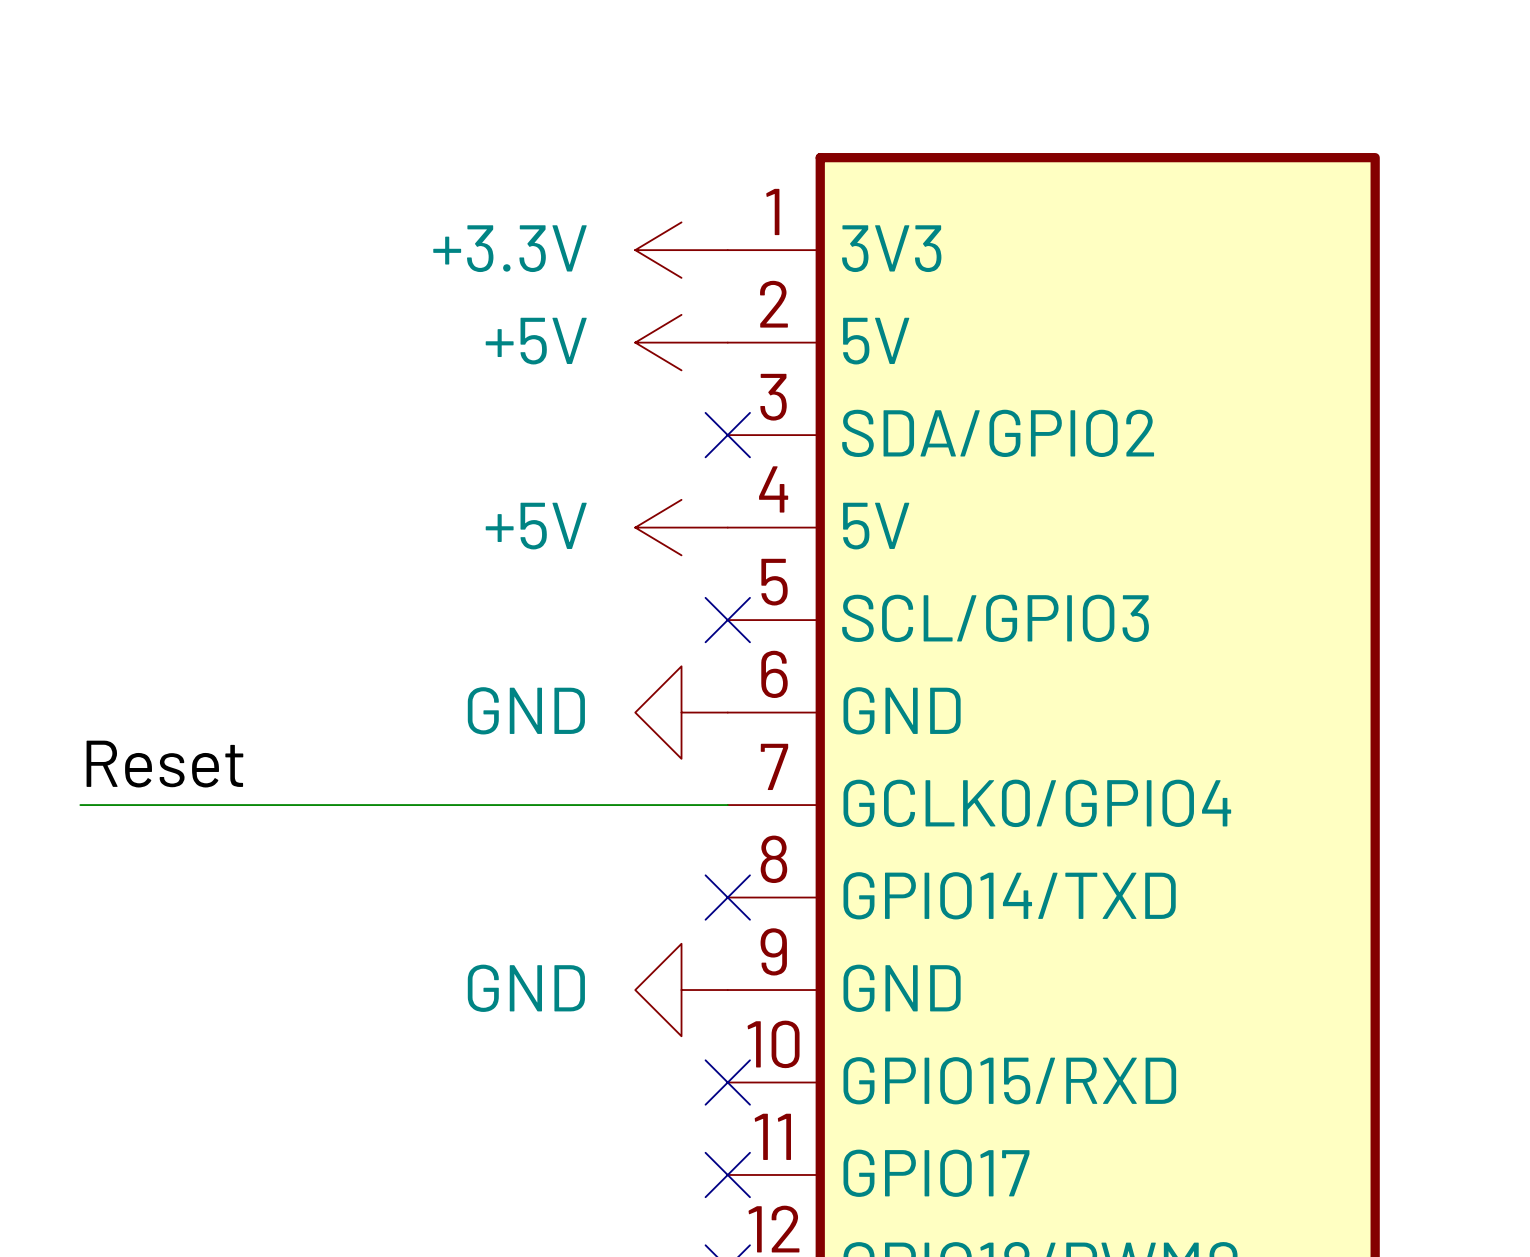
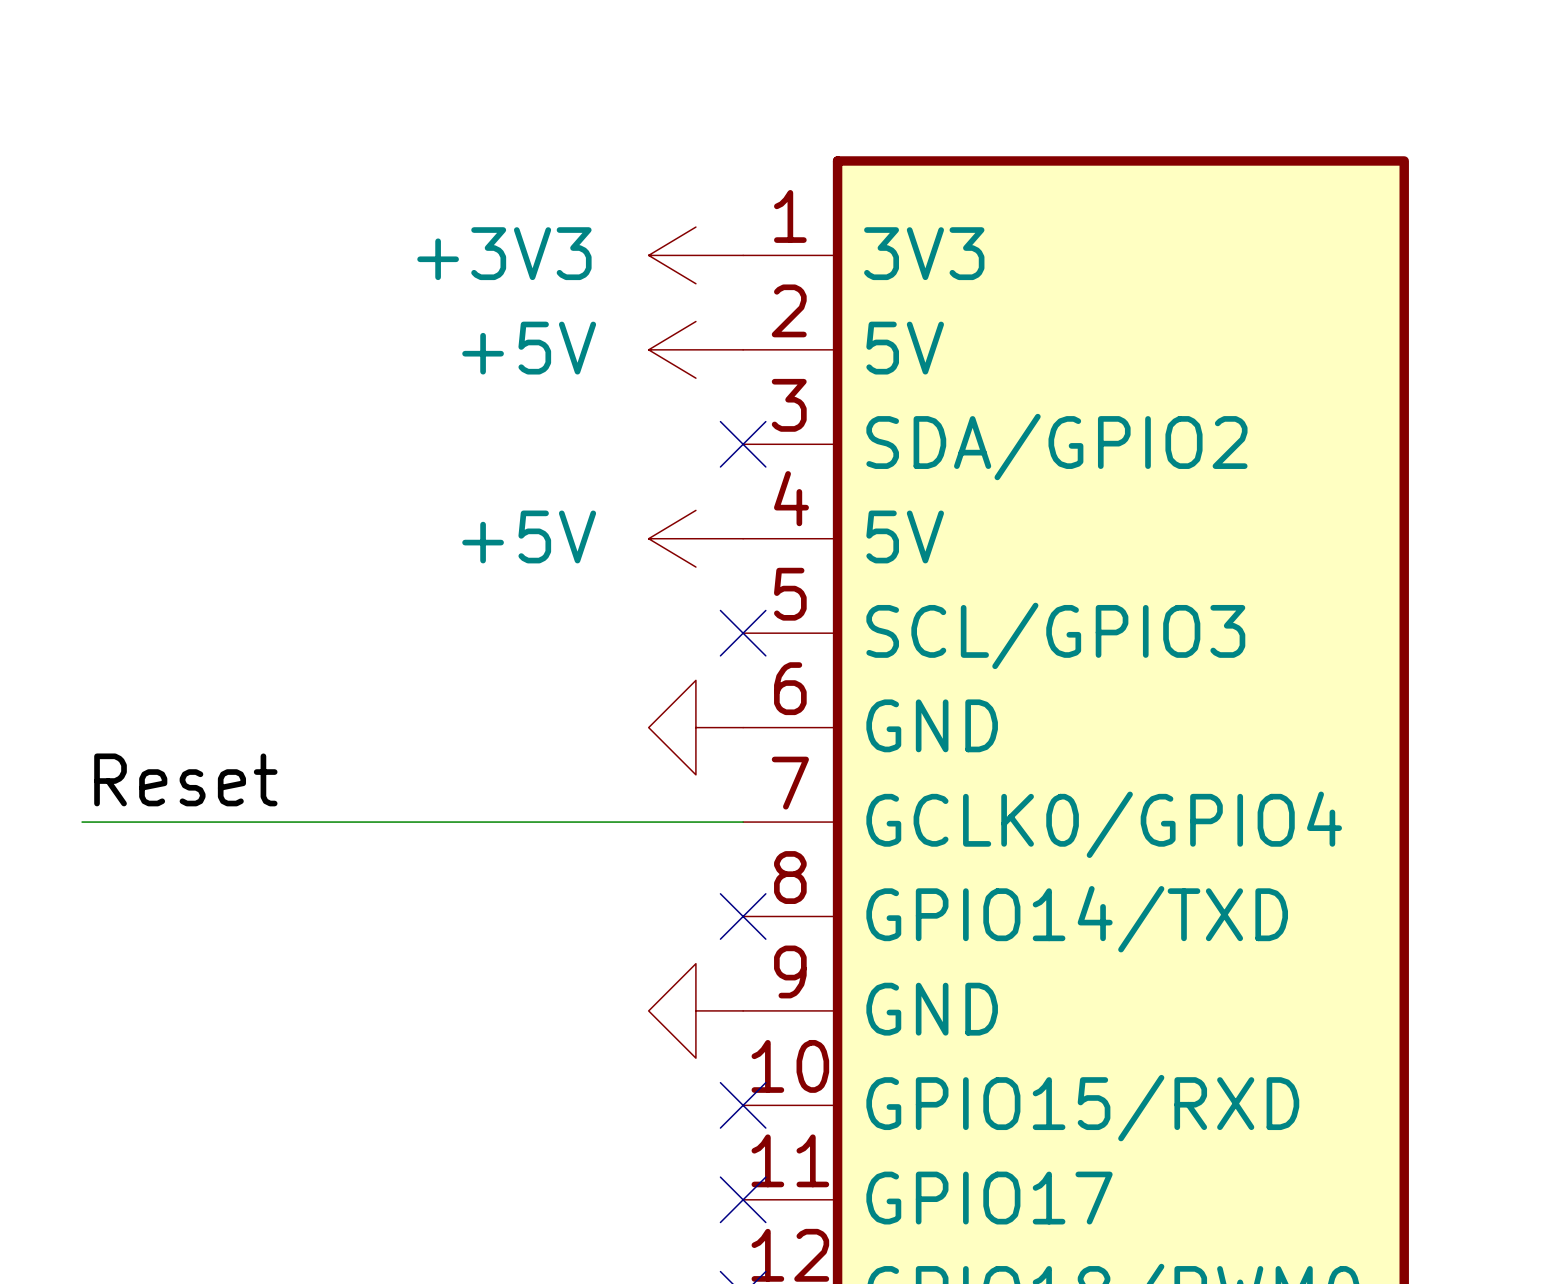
power symbol: +3.3V (681, 250) -> +3V3 (695, 255)
power symbol text: GND (526, 710) -> none
power symbol text: GND (526, 988) -> none

